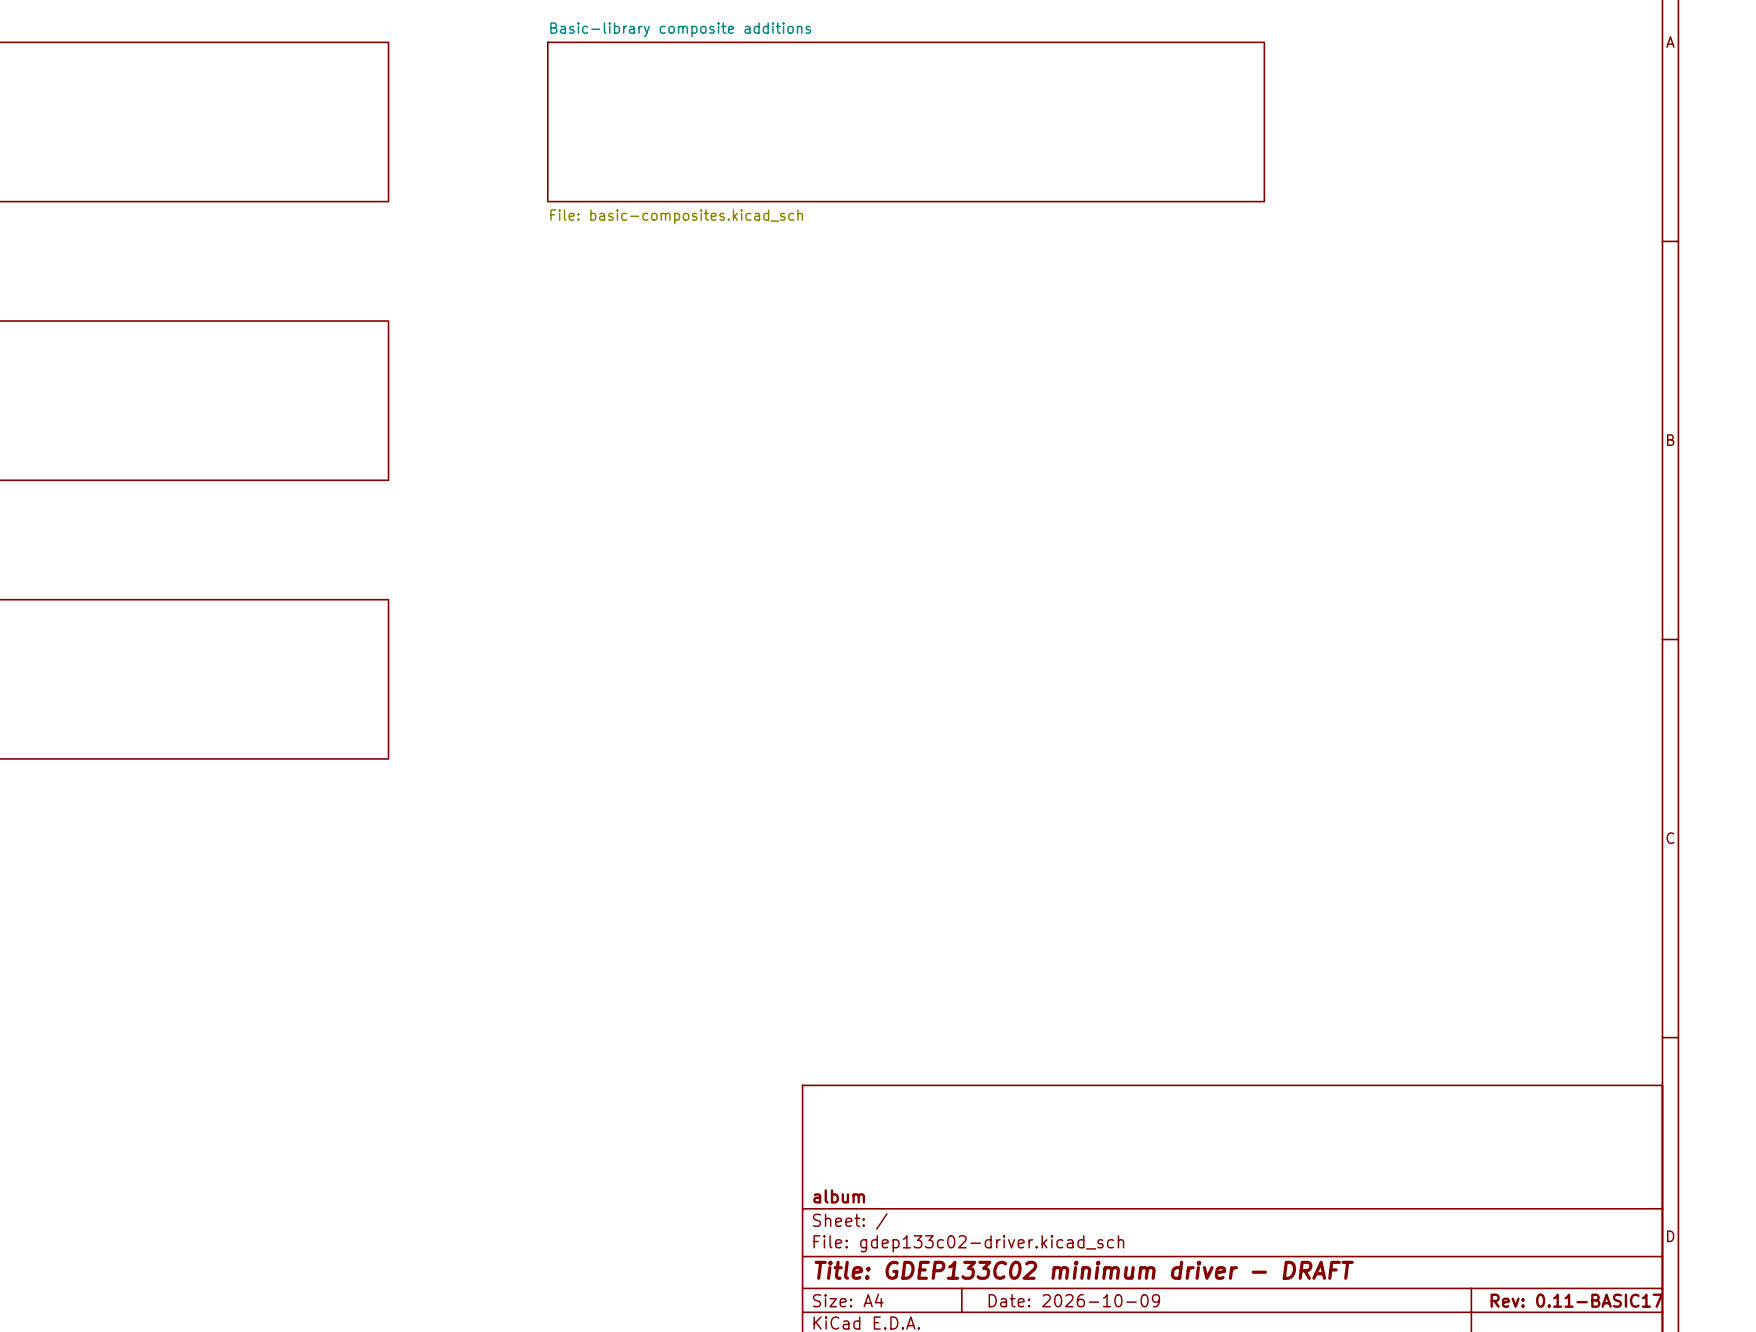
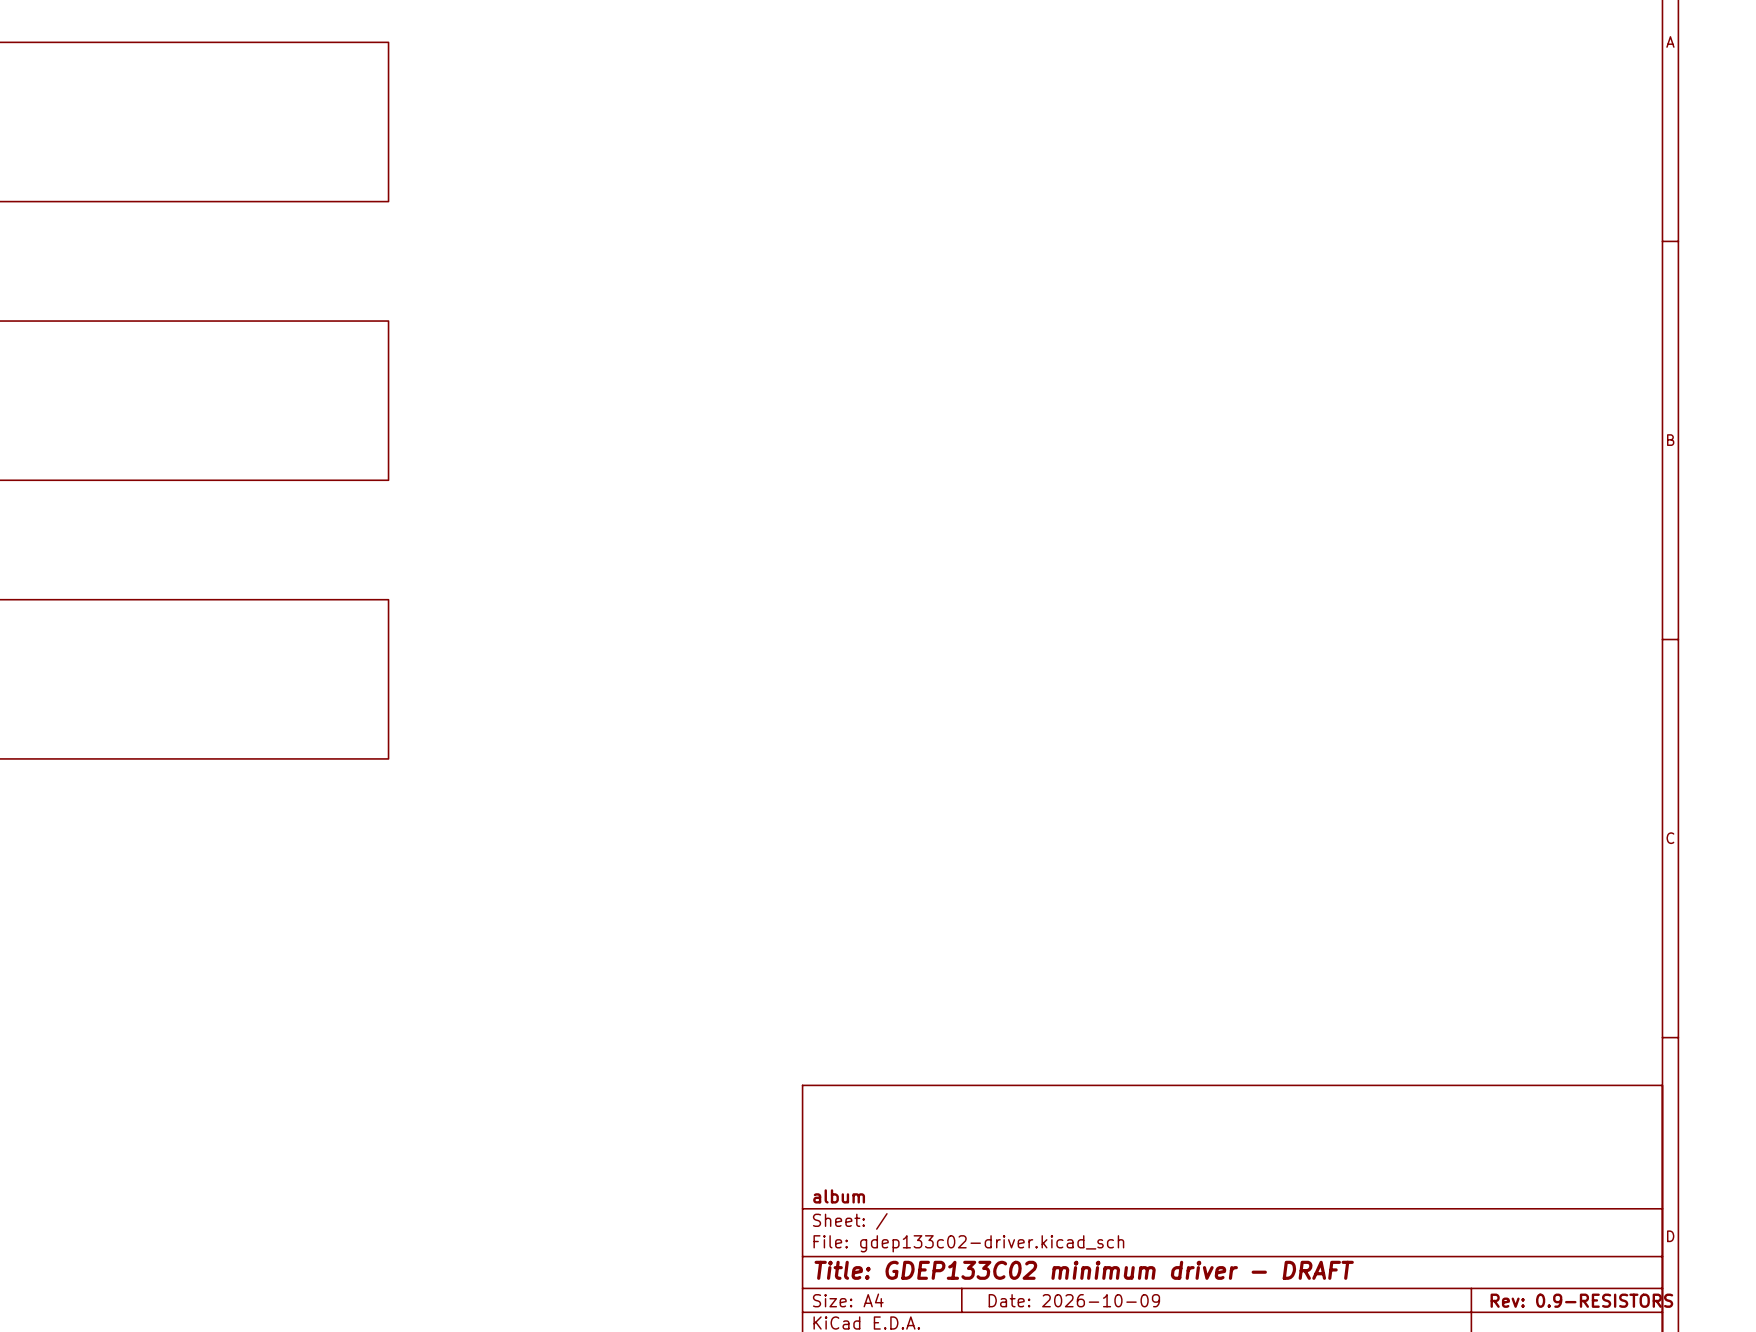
sheet Basic-library composite additions: File: basic-composites.kicad_sch (906, 121) -> none
title block: Rev: 0.11-BASIC17 (1576, 1300) -> Rev: 0.9-RESISTORS (1581, 1300)

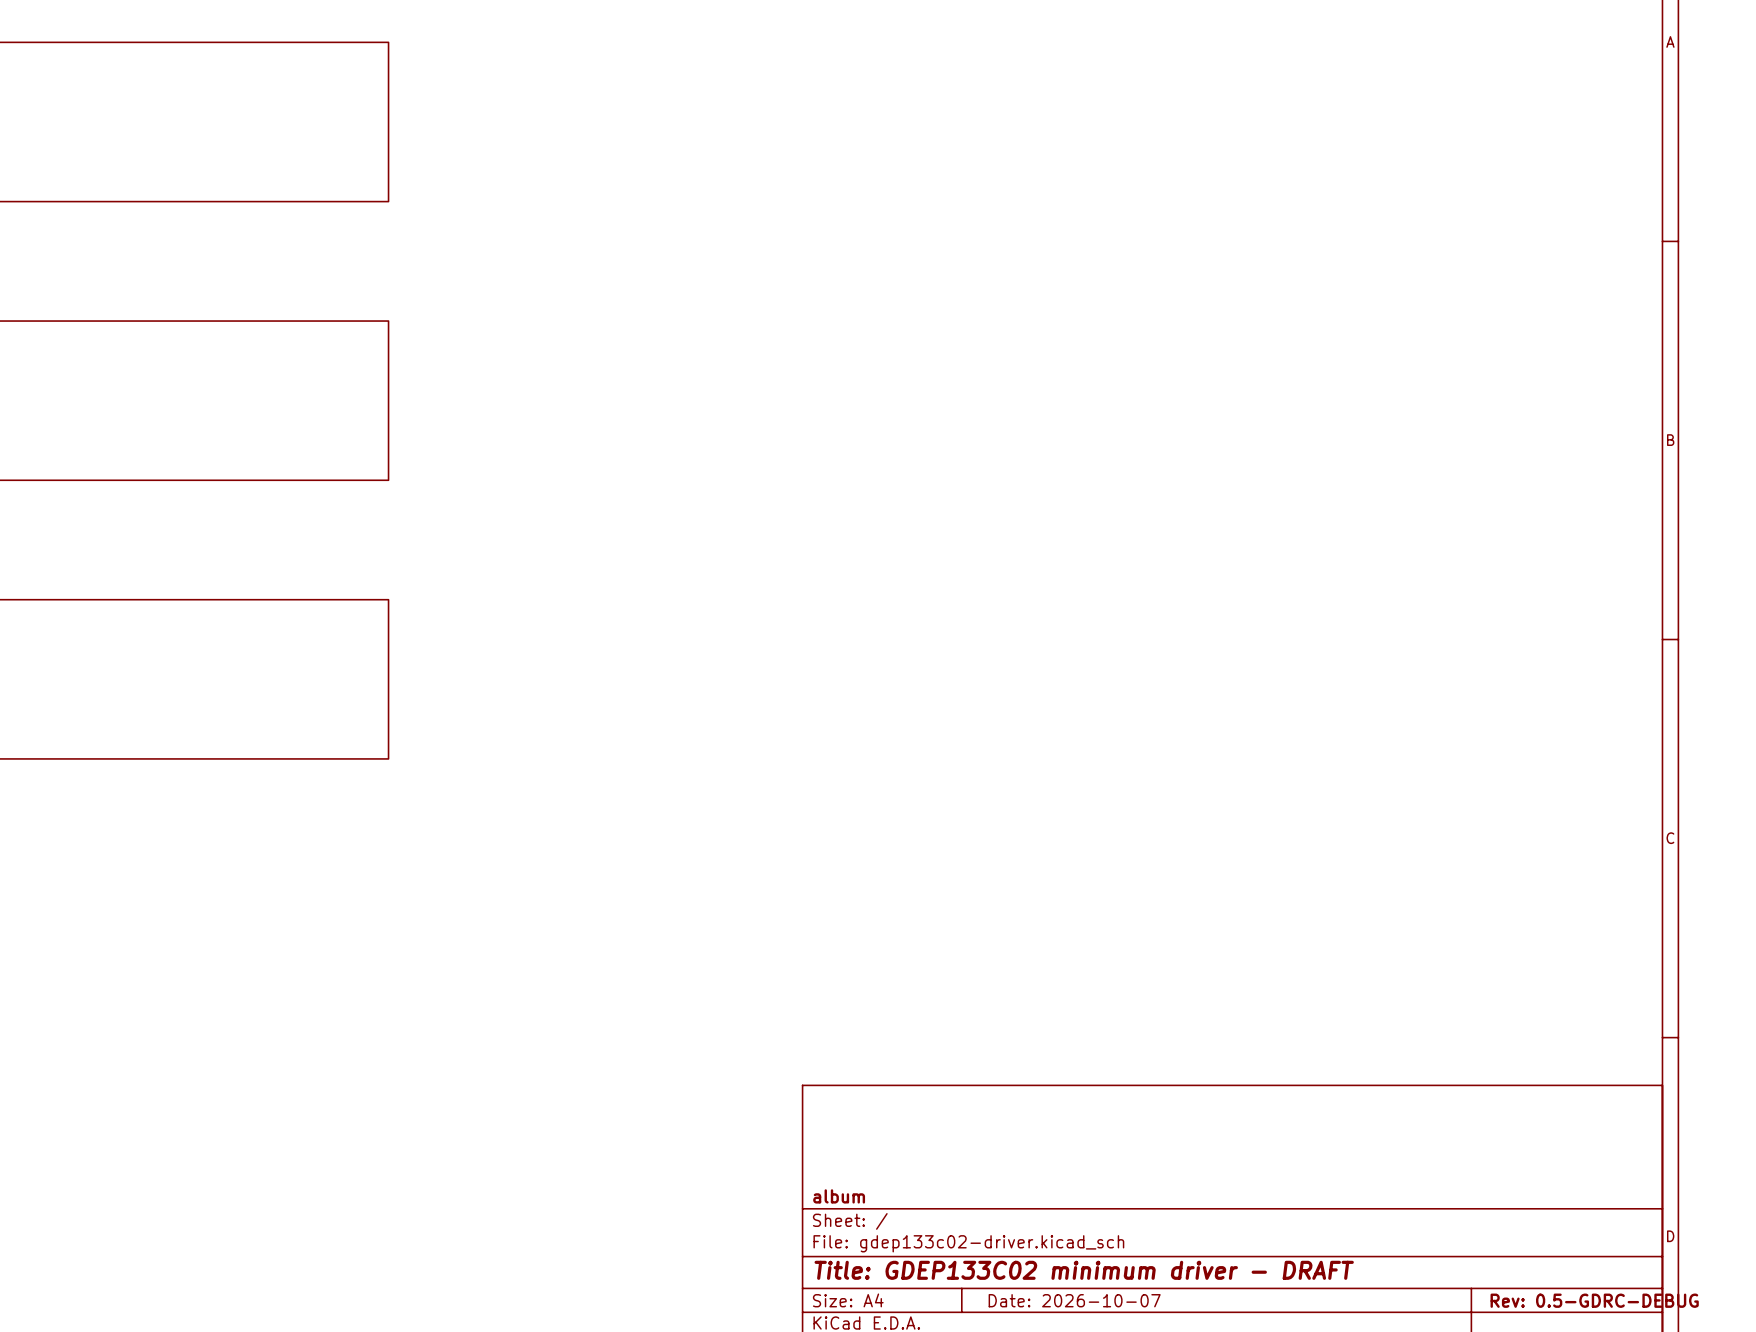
title block: Date: 2026-10-09 (1074, 1300) -> Date: 2026-10-07 (1074, 1300)
title block: Rev: 0.9-RESISTORS (1581, 1300) -> Rev: 0.5-GDRC-DEBUG (1594, 1300)

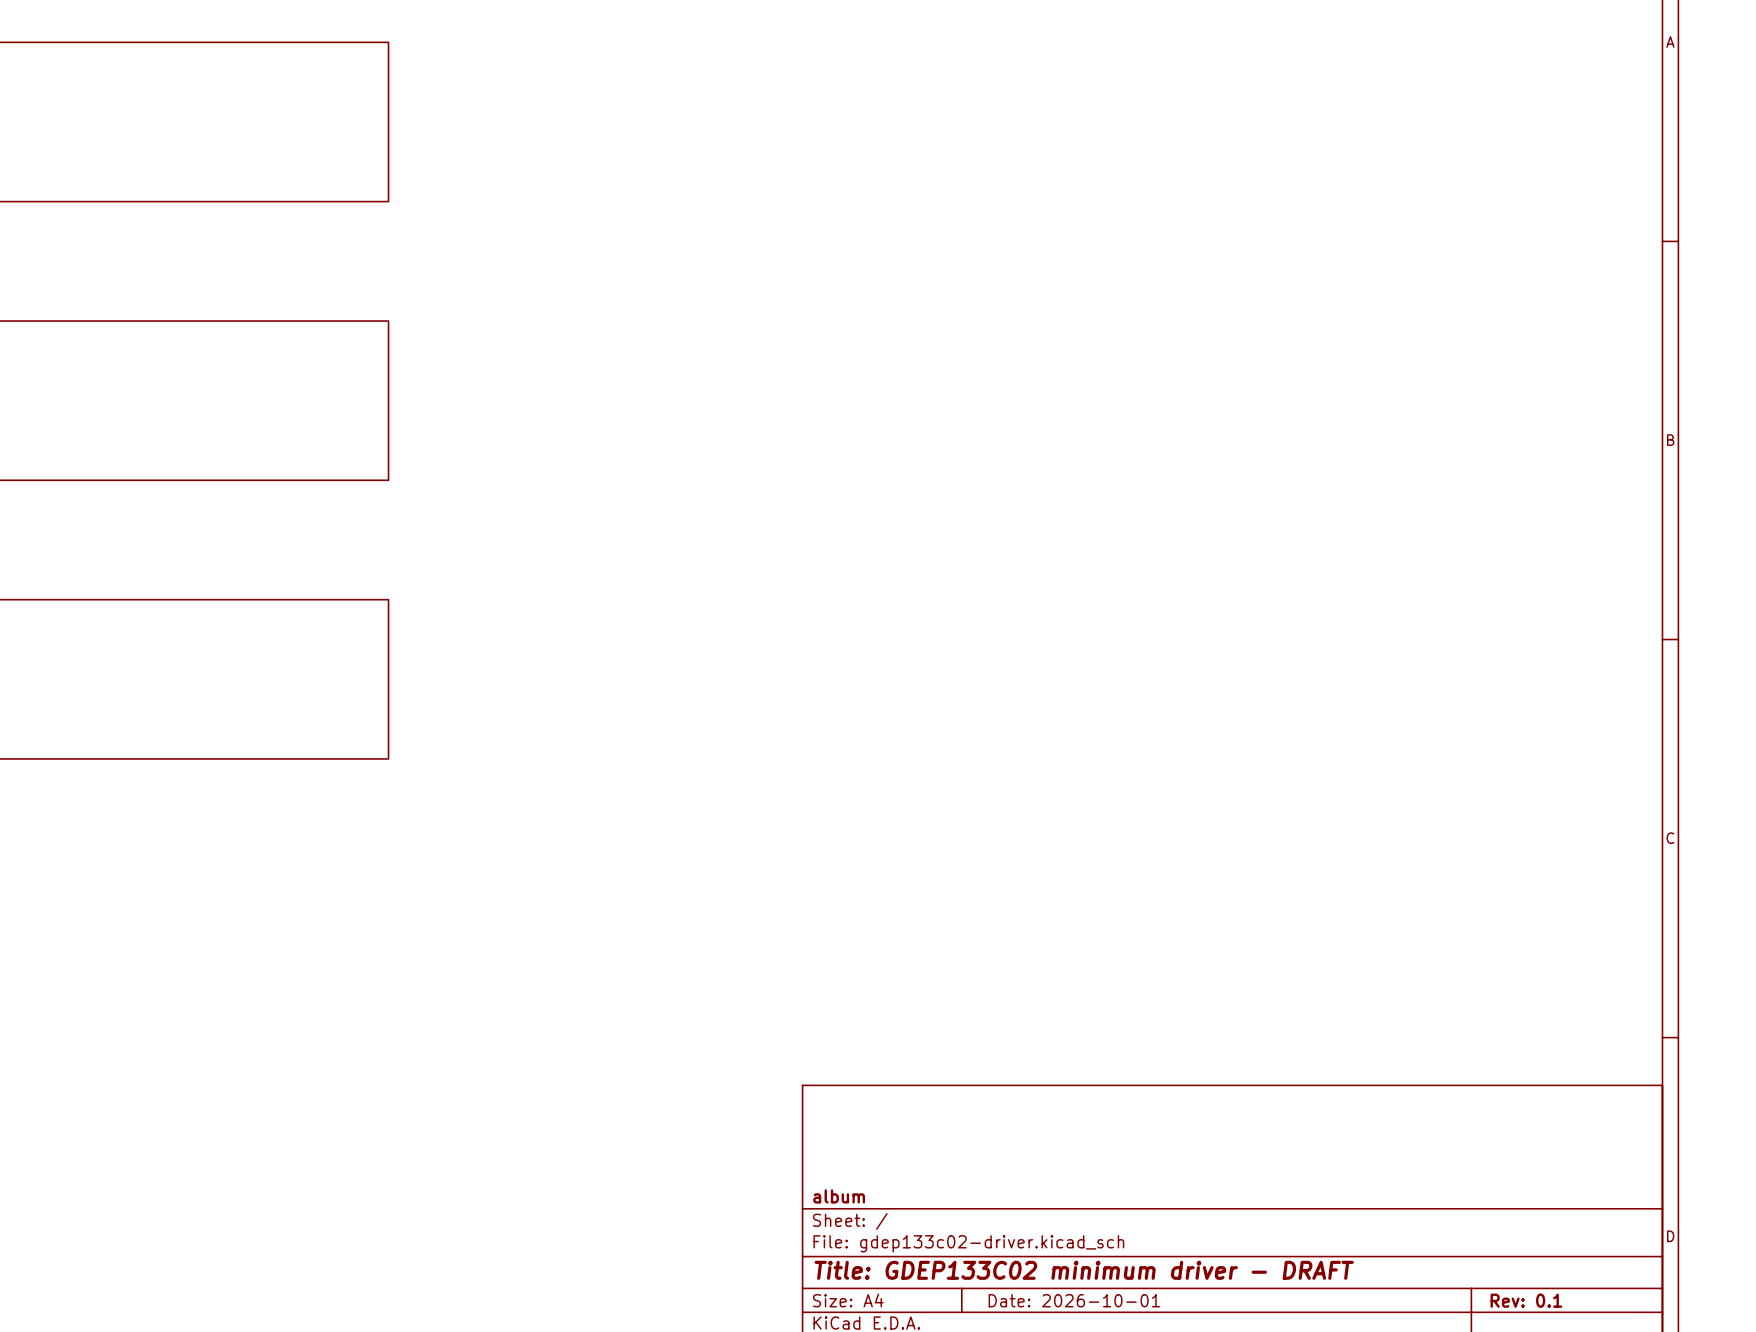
title block: Date: 2026-10-07 (1074, 1300) -> Date: 2026-10-01 (1074, 1300)
title block: Rev: 0.5-GDRC-DEBUG (1594, 1300) -> Rev: 0.1 (1526, 1300)

